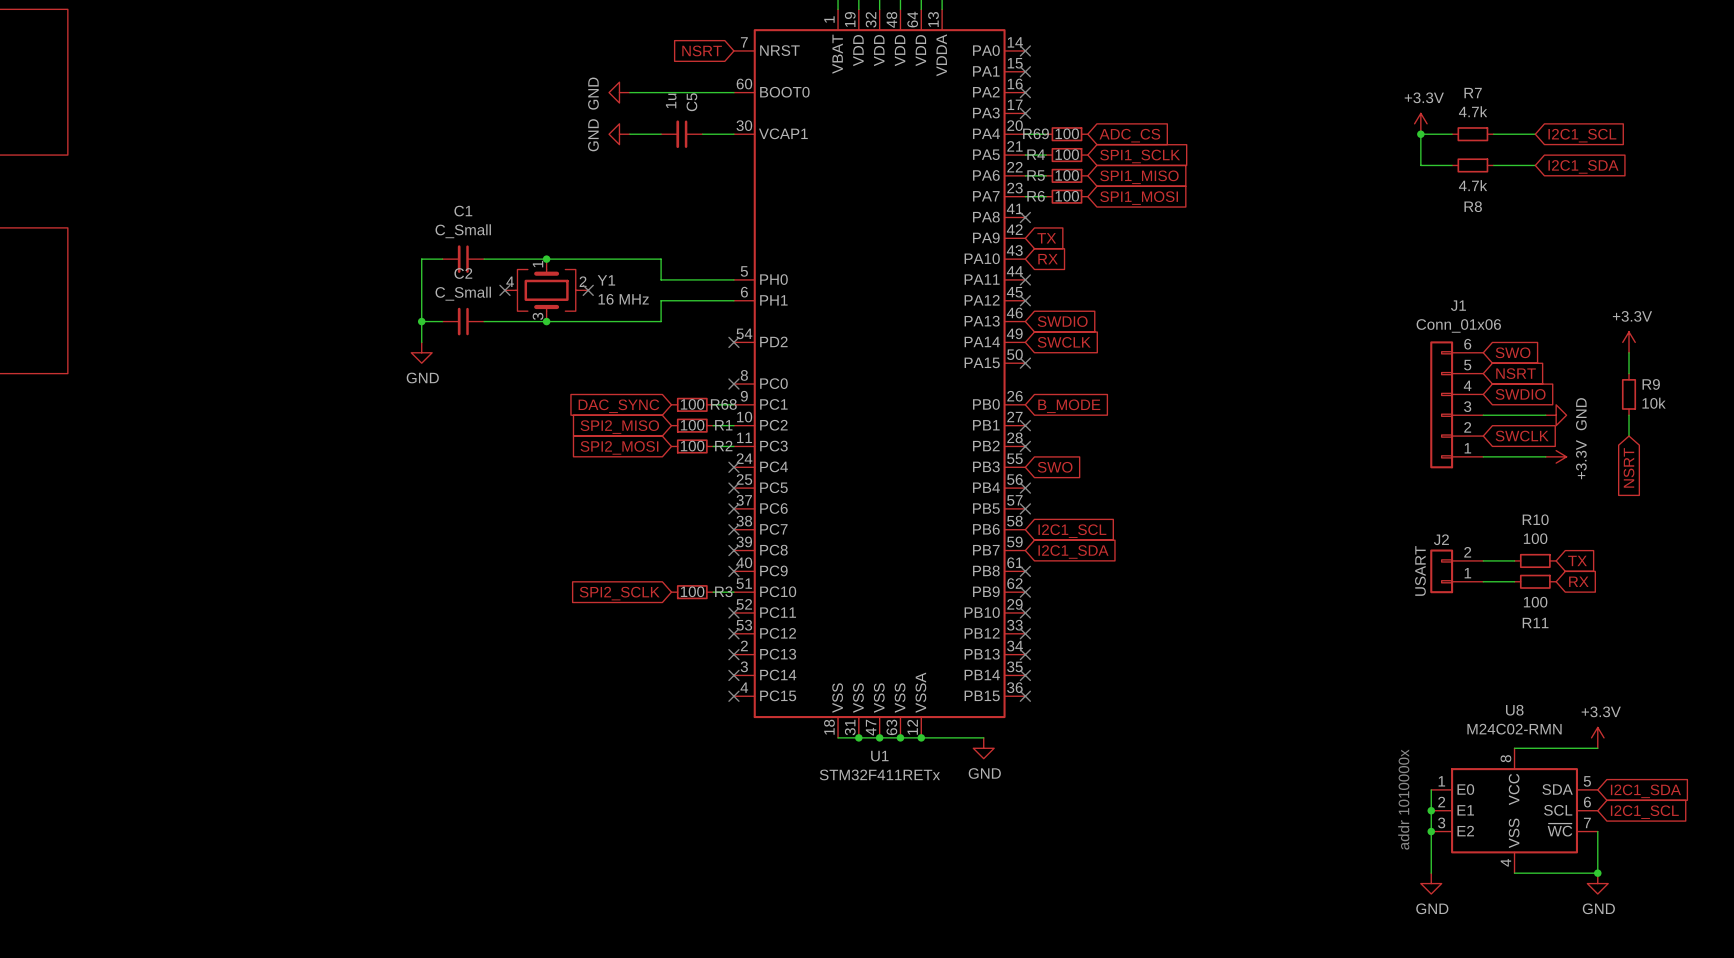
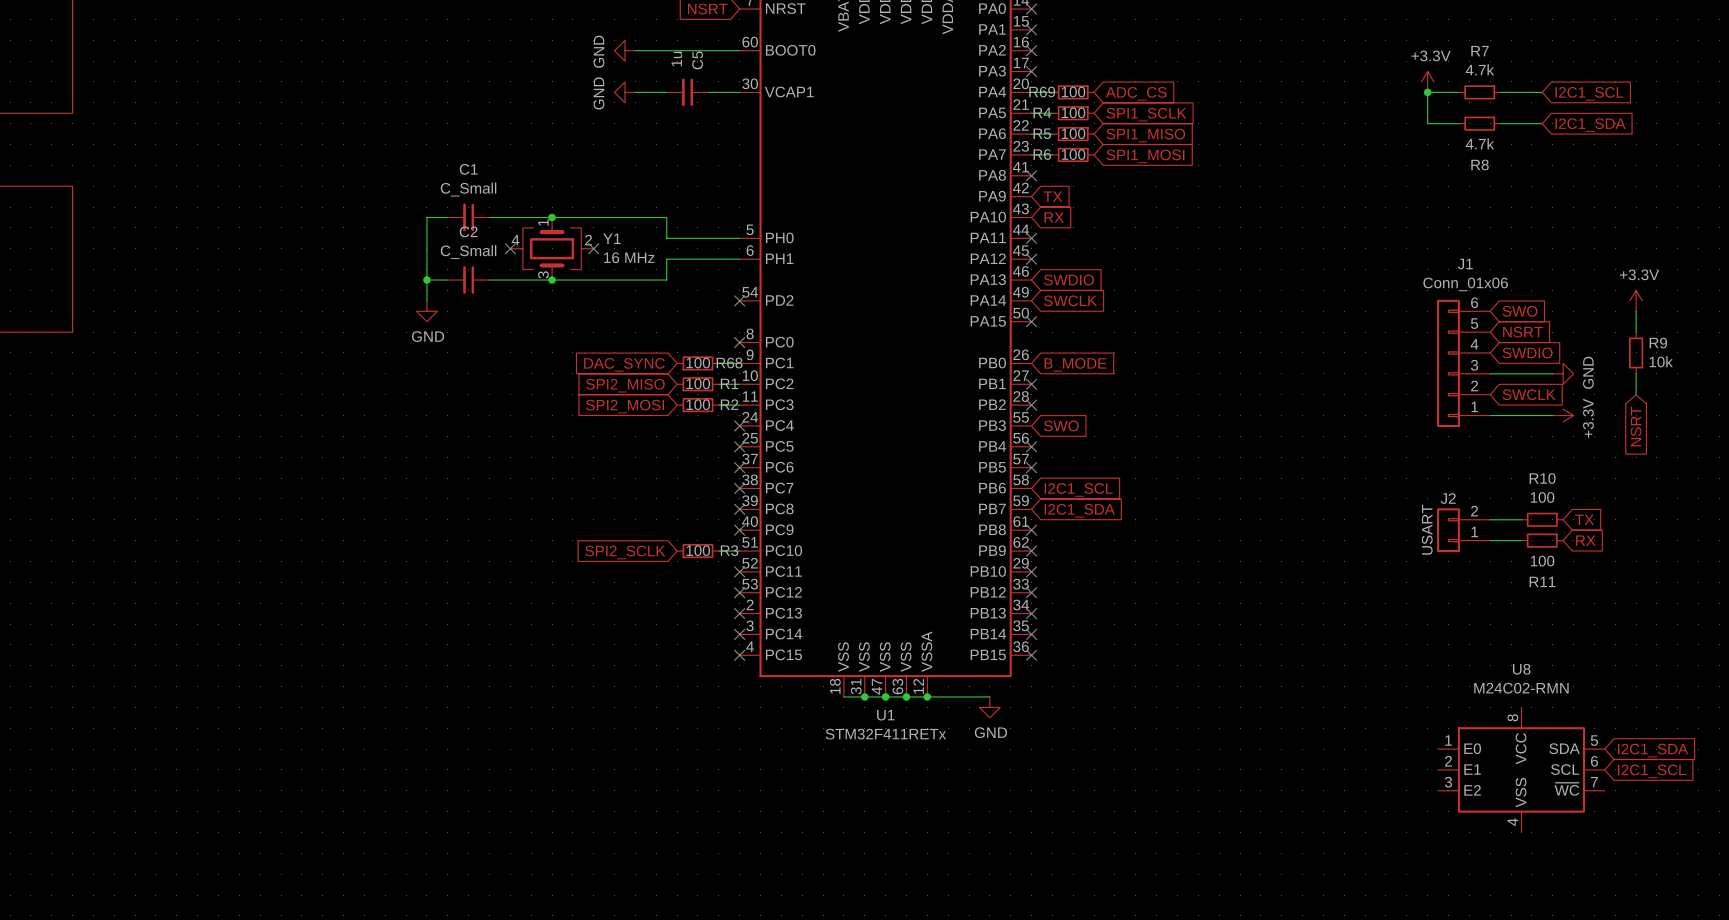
power symbol: +3.3V (1597, 737) -> none
wire: (1514, 748) (1597, 748) -> none
wire: (1431, 789) (1431, 873) -> none
text: addr 1010000x (1403, 799) -> none
junction: (1431, 810) -> none
junction: (1431, 831) -> none
wire: (1597, 831) (1597, 873) (1514, 873) -> none
junction: (1597, 873) -> none
power symbol: GND (1431, 883) -> none
power symbol: GND (1597, 883) -> none

